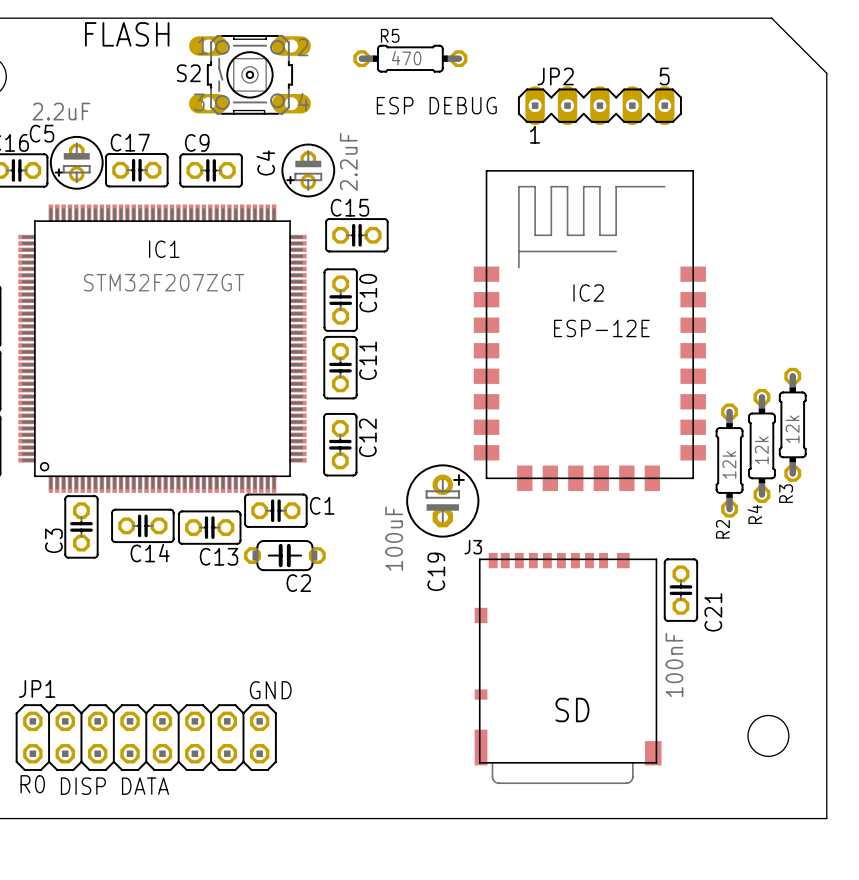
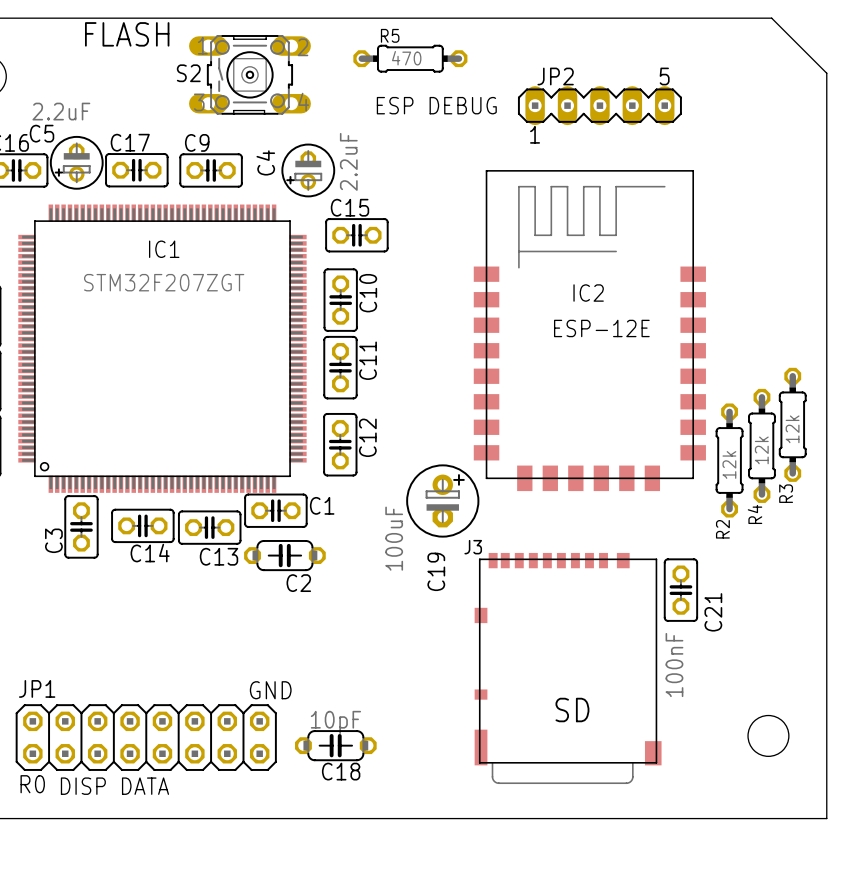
C18: none -> 10pF (335, 745)

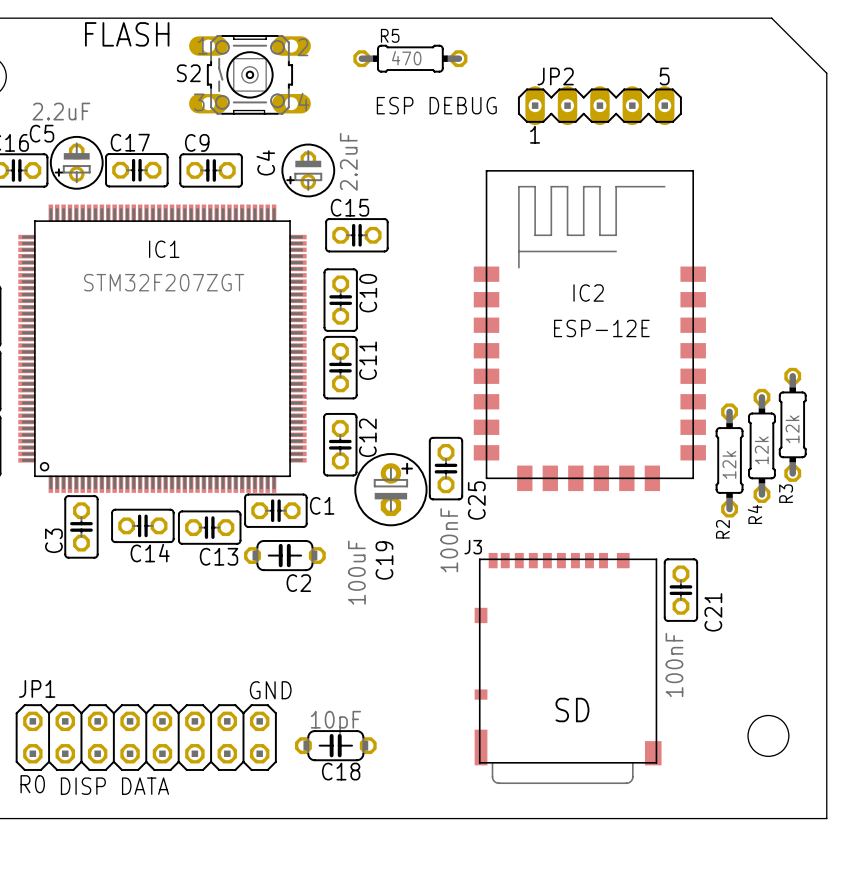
C25: none -> 100nF (446, 468)
C19 position: (442, 501) -> (390, 489)
C19 value position: 100uF (394, 538) -> 100uF (356, 572)

